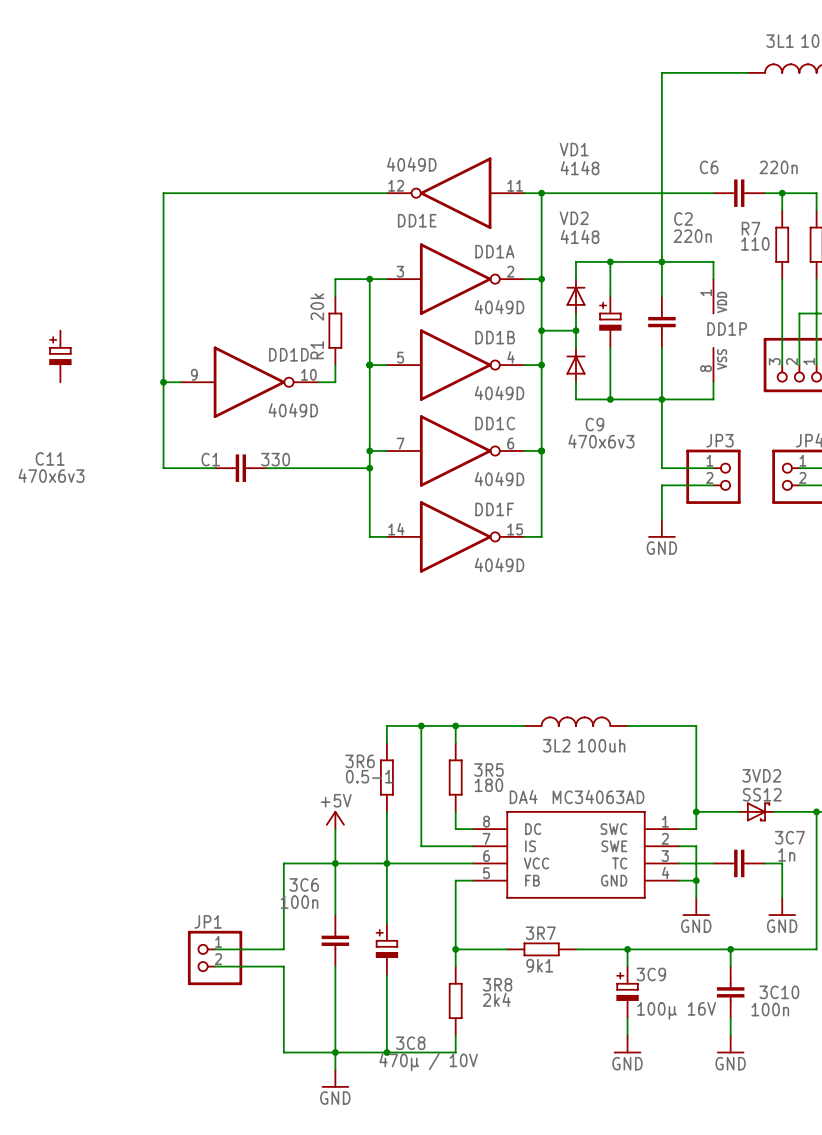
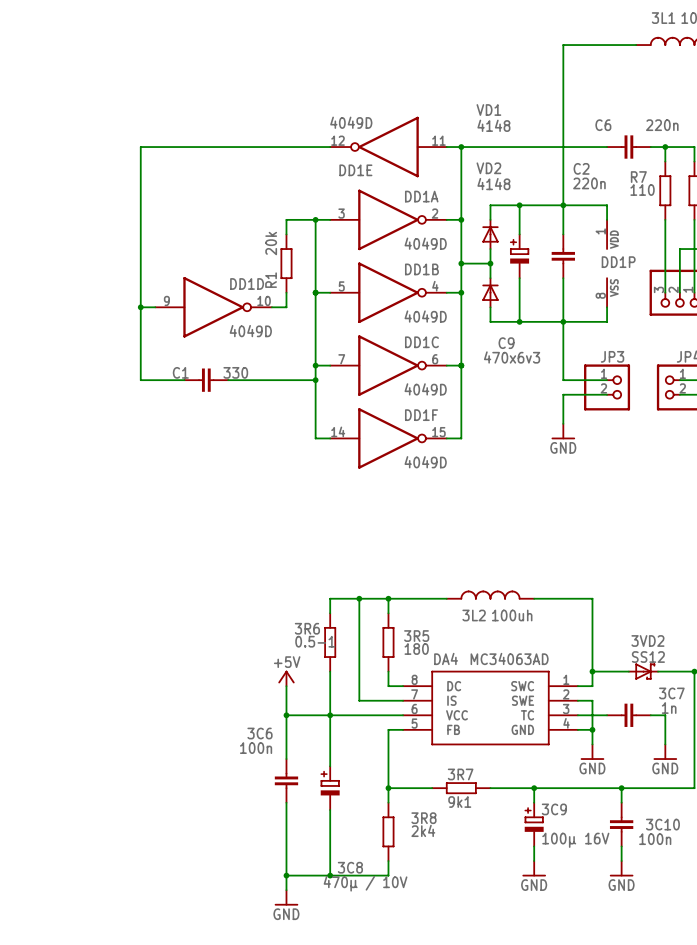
C11: 470x6v3 (60, 356) -> none
wire: (335, 863) (283, 863) (283, 949) (215, 949) -> none
JP1: (215, 957) -> none
wire: (215, 966) (283, 966) (283, 1052) (335, 1052) -> none

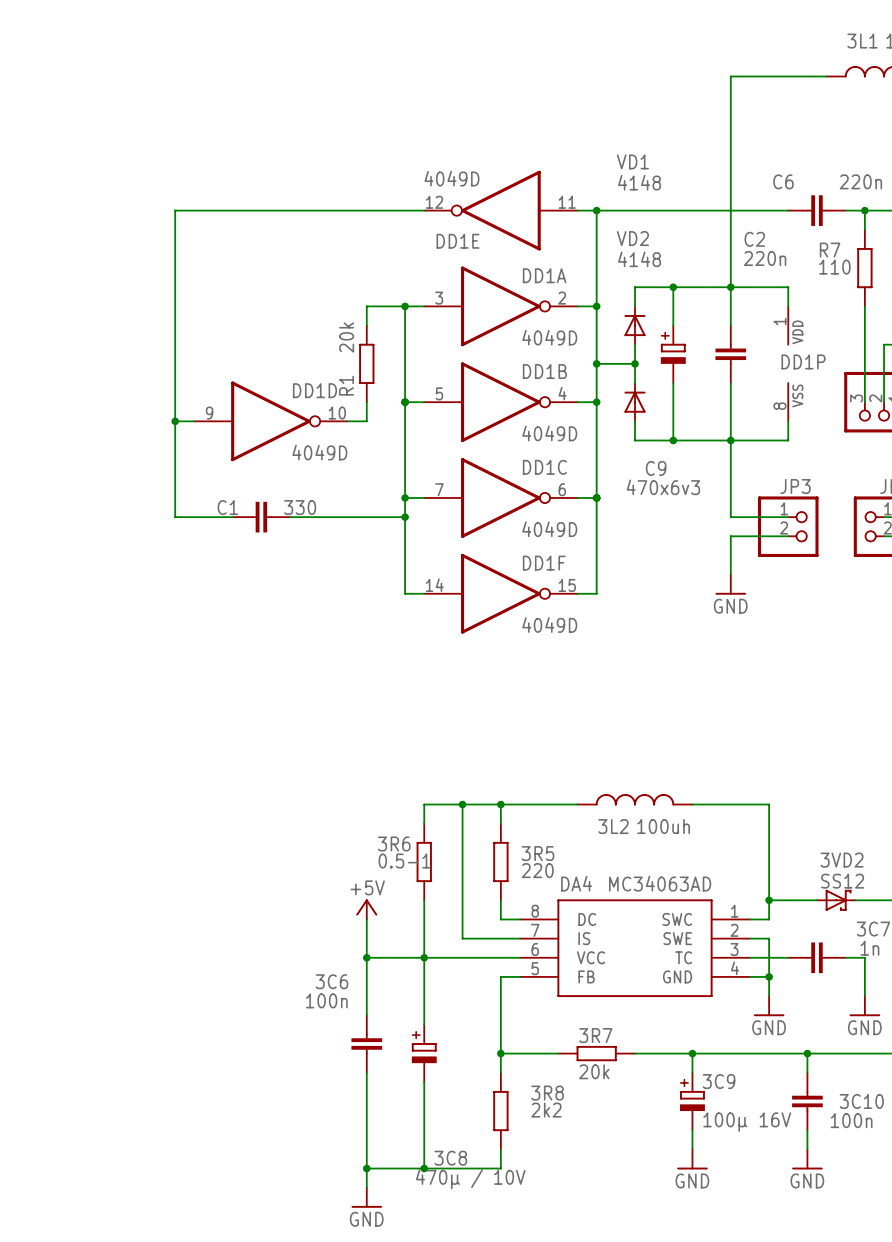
3R5 value: 180 (416, 649) -> 220 (537, 870)
3R7 value: 9k1 (459, 802) -> 20k (594, 1071)
3R8 value: 2k4 (423, 830) -> 2k2 (546, 1110)

